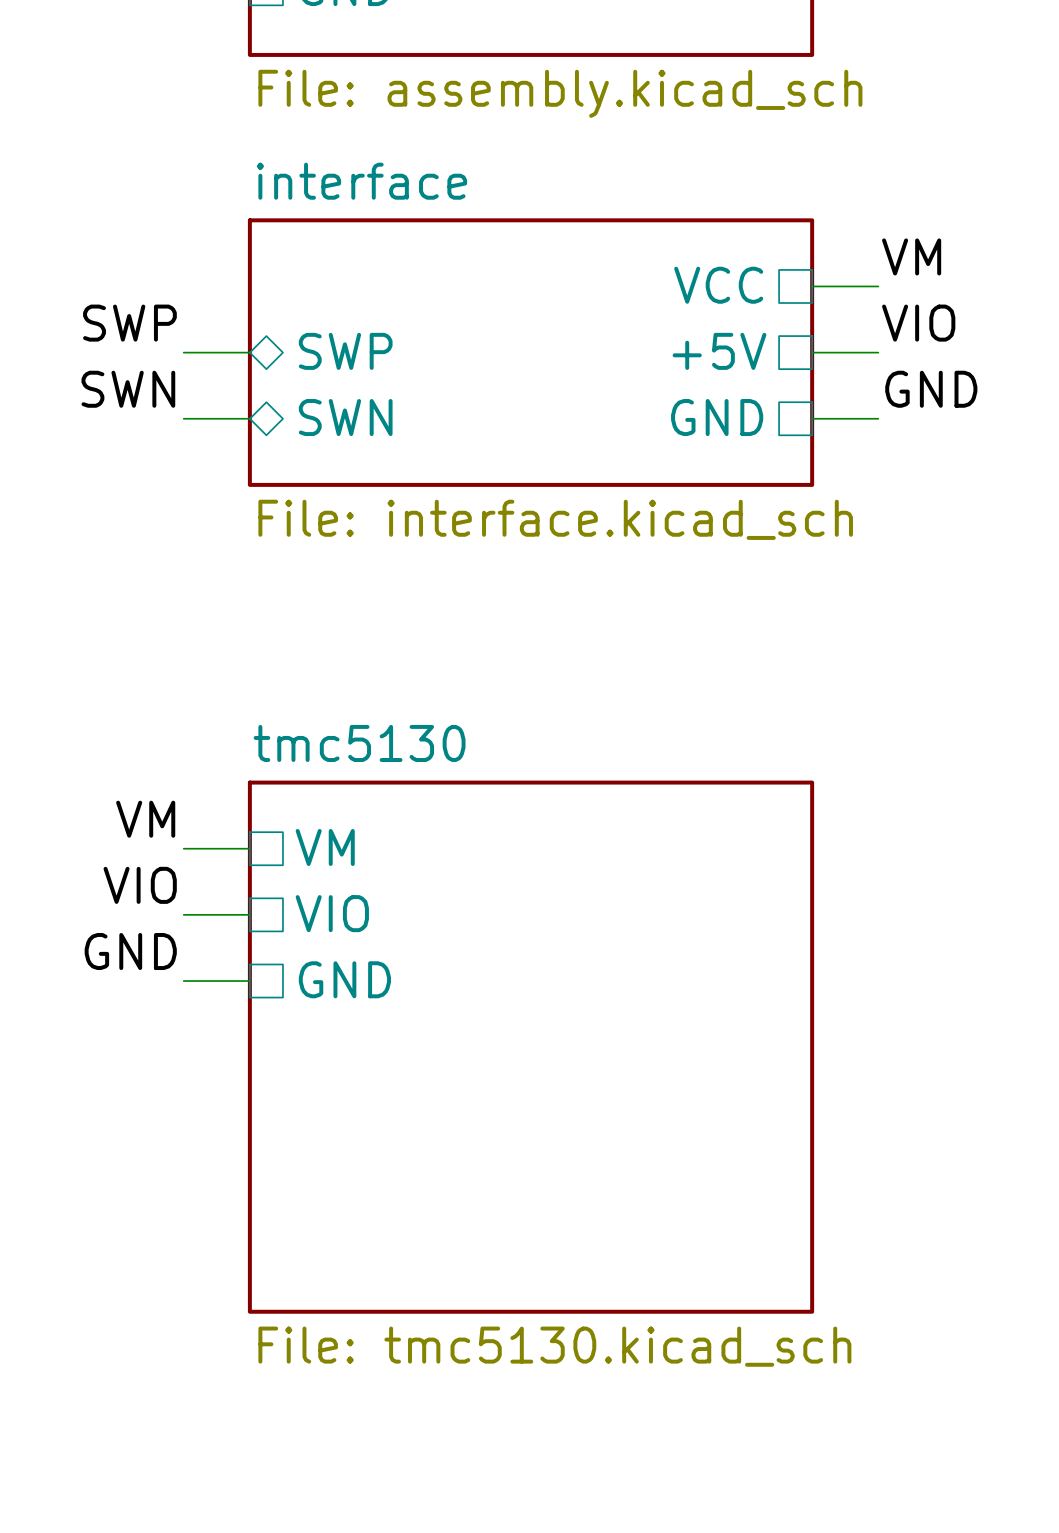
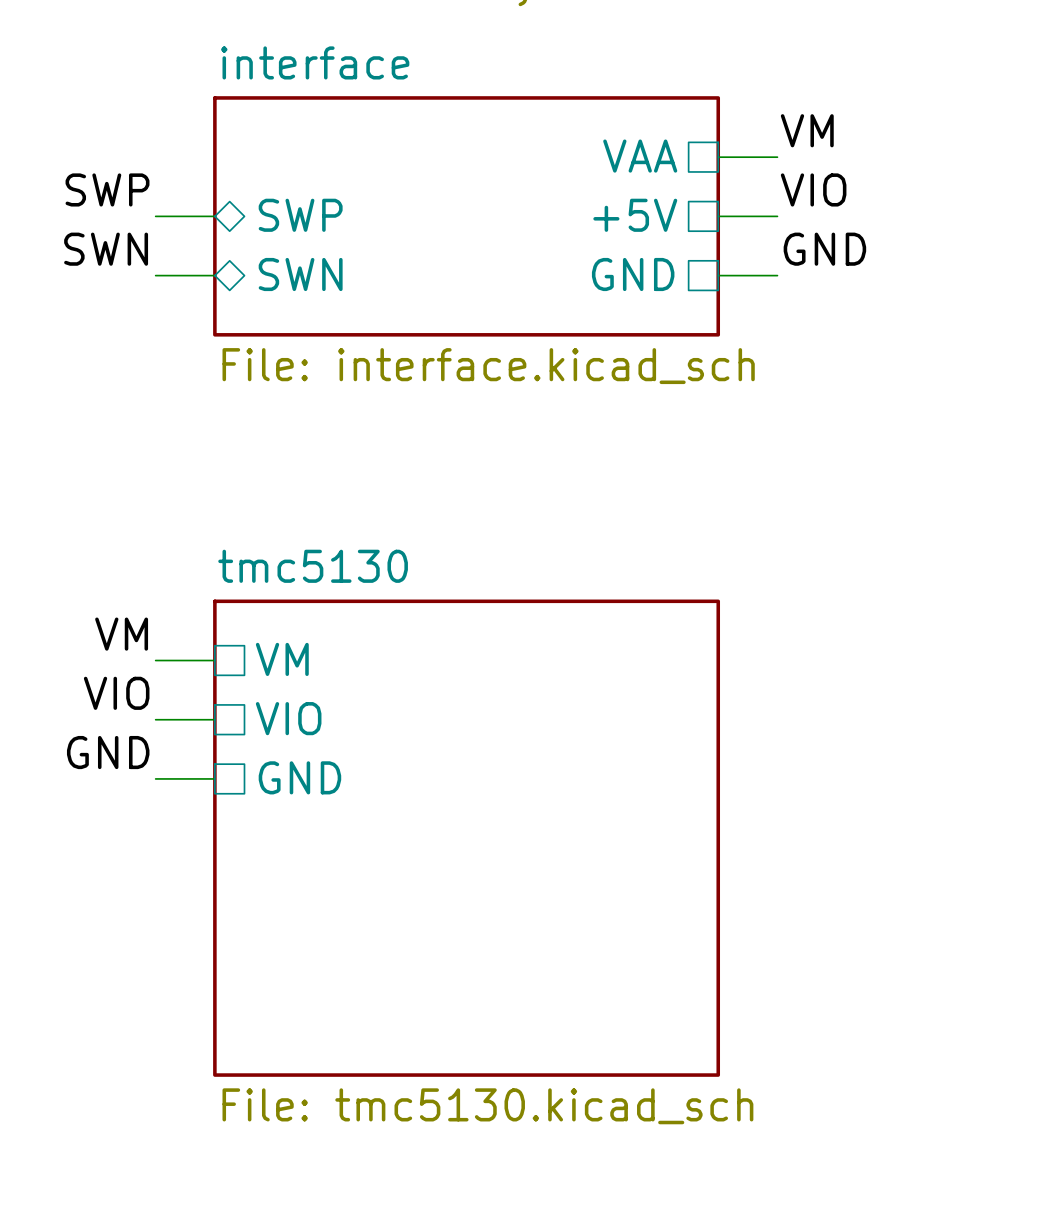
sheet pin: VCC (718, 285) -> VAA (640, 156)

